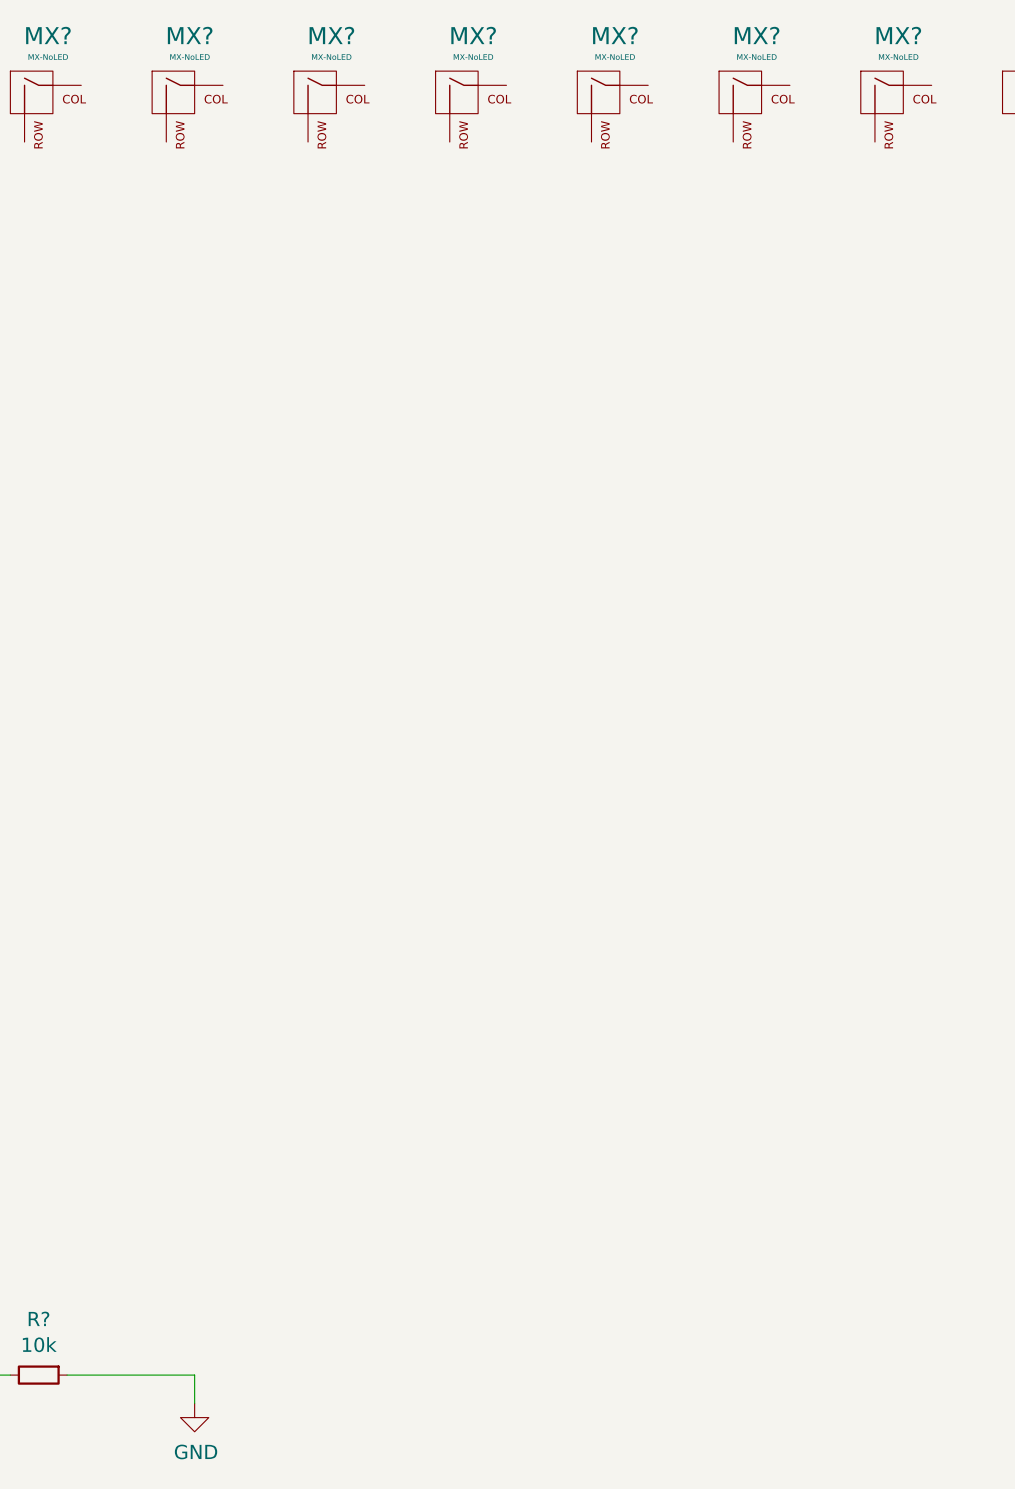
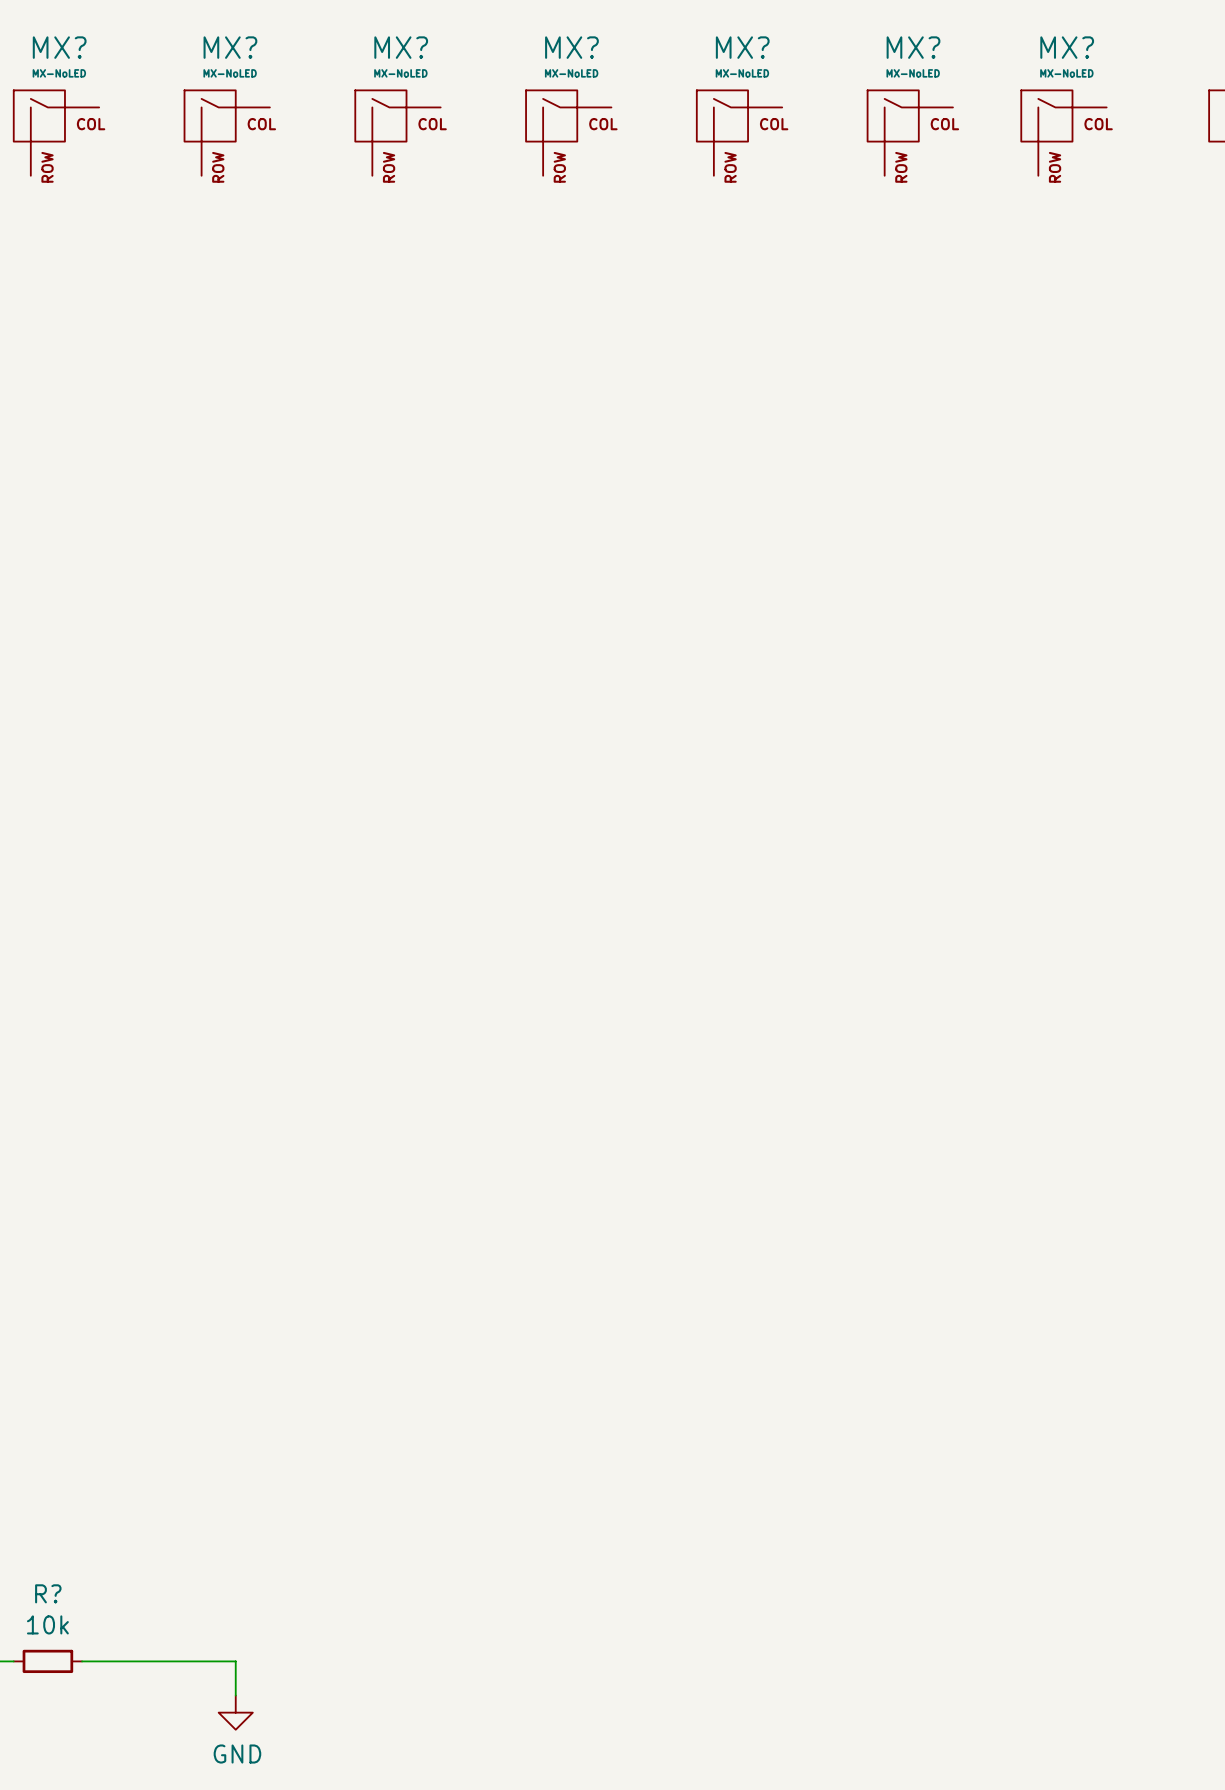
MX? position: (896, 106) -> (1063, 133)

